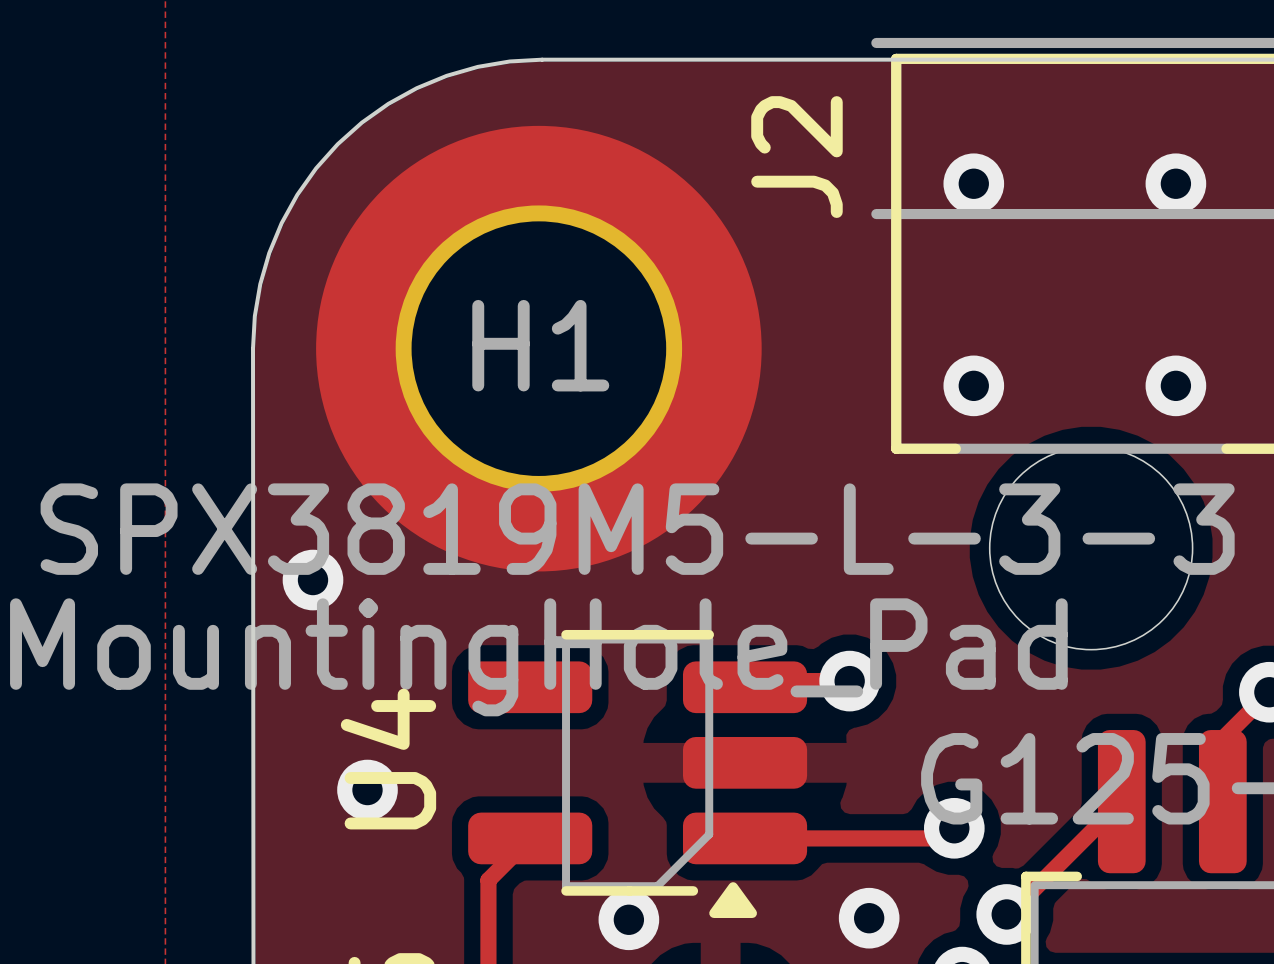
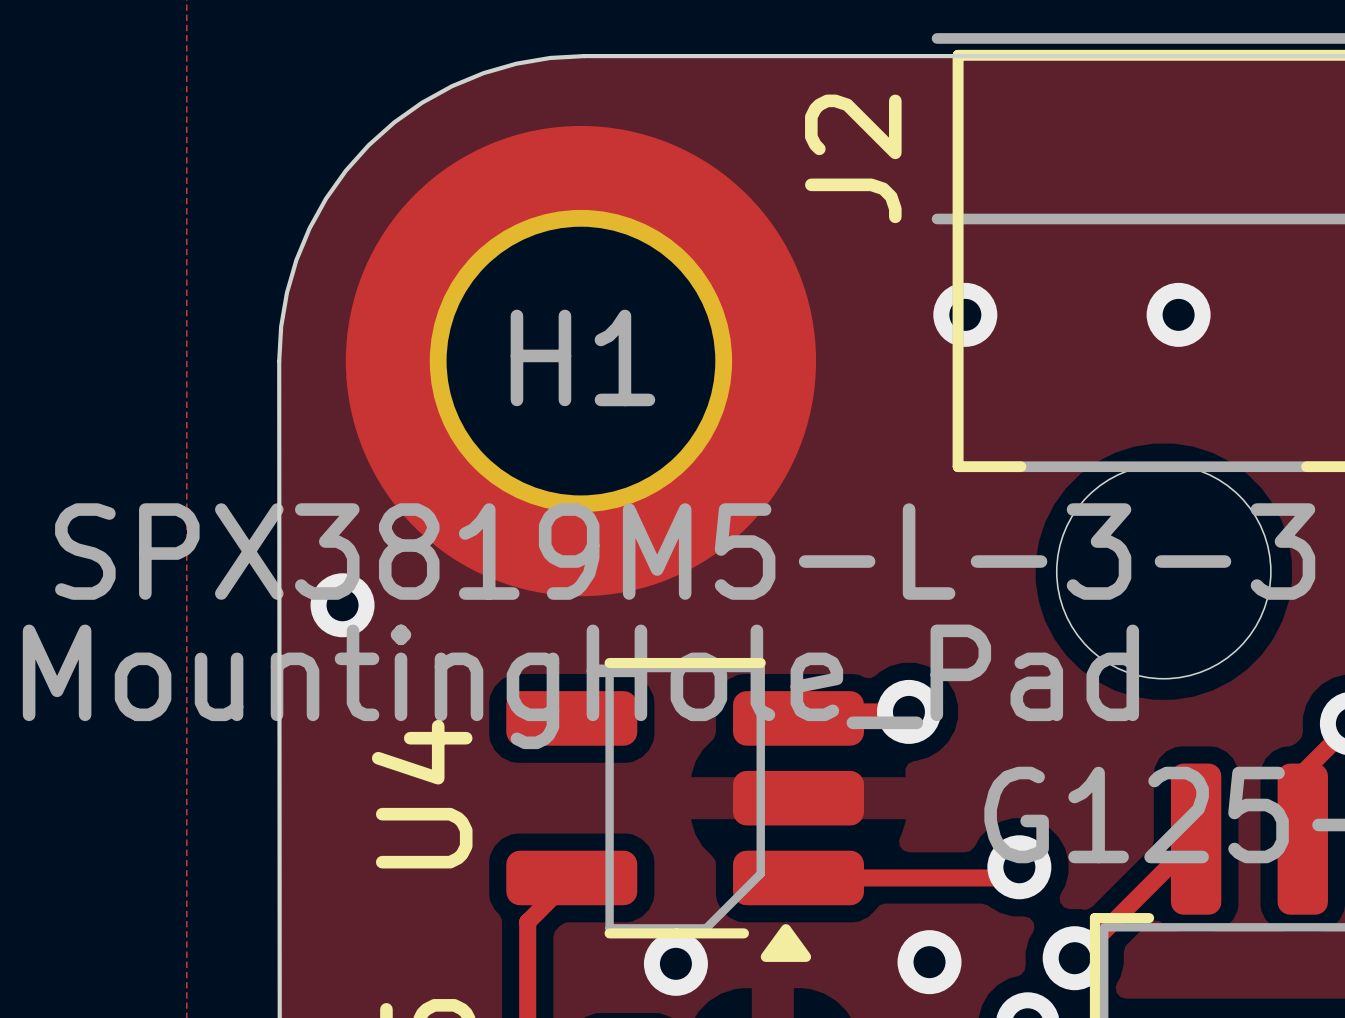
via: (973, 183) -> none
via: (1175, 183) -> none
via: none -> (965, 314)
via: none -> (1178, 314)
via: (973, 385) -> none
via: (1175, 385) -> none
via: (367, 790) -> none

